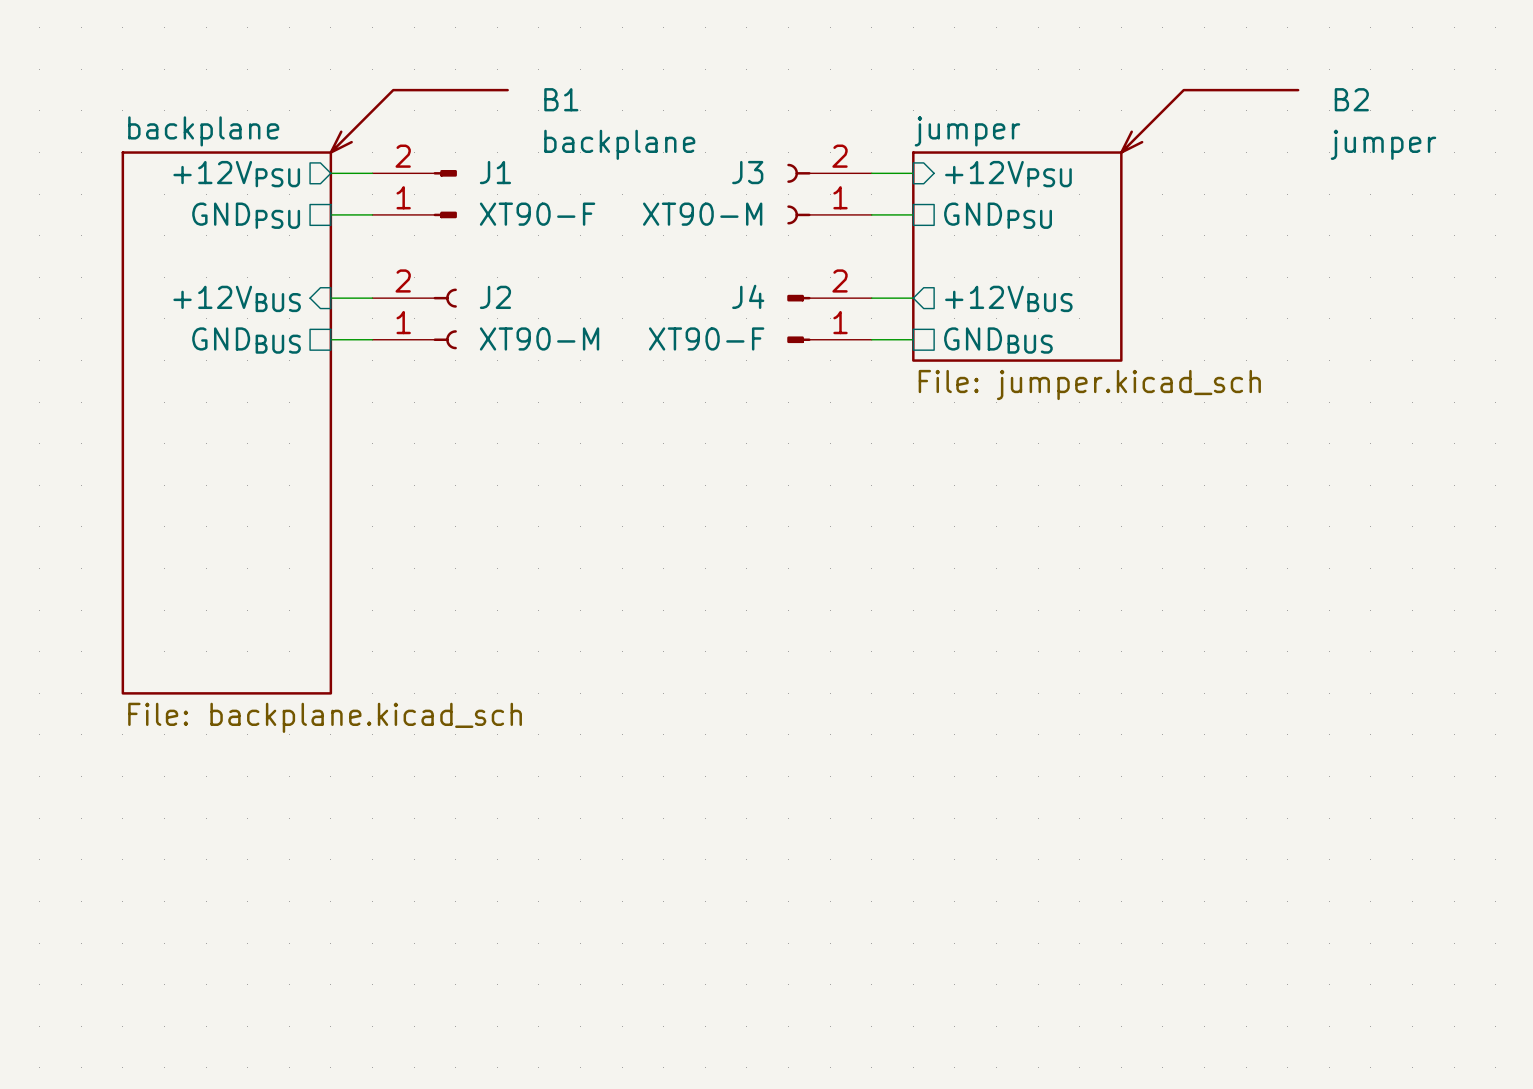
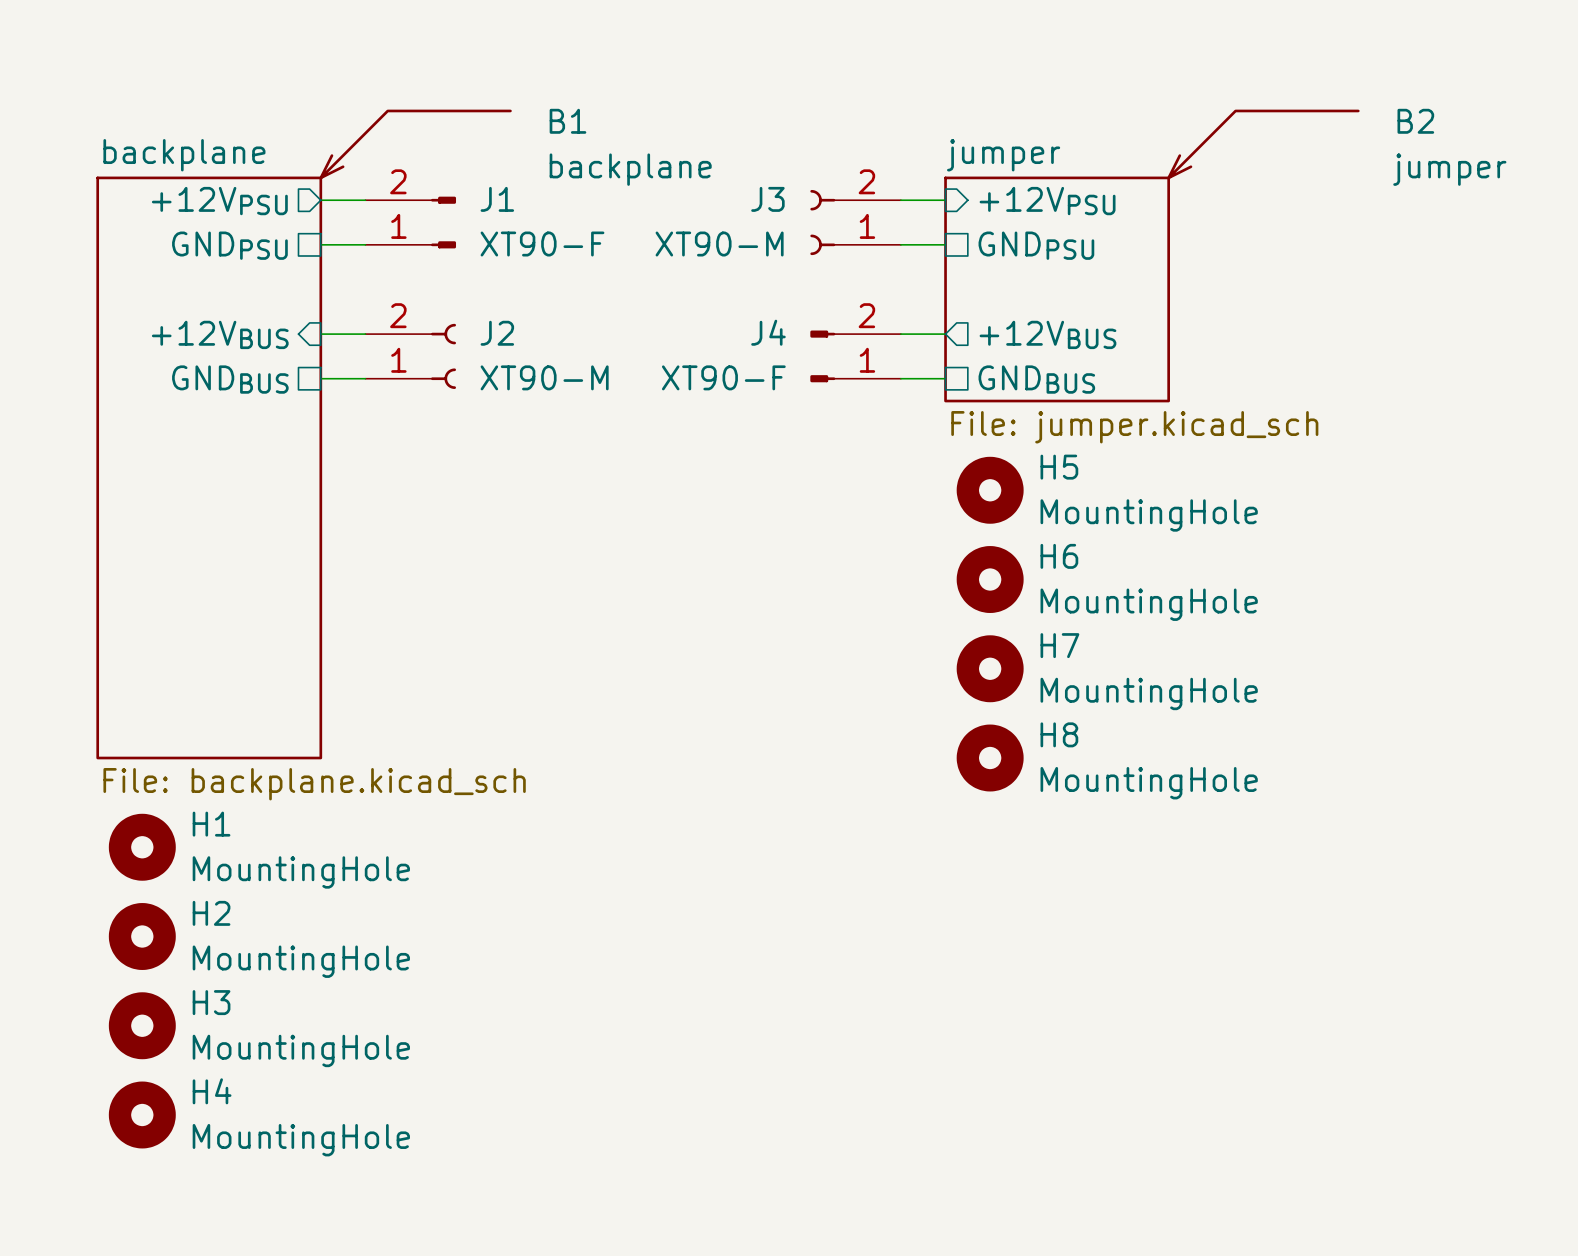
H5: none -> MountingHole (990, 490)
H6: none -> MountingHole (990, 579)
H7: none -> MountingHole (990, 668)
H8: none -> MountingHole (990, 758)
H1: none -> MountingHole (142, 847)
H2: none -> MountingHole (142, 936)
H3: none -> MountingHole (142, 1025)
H4: none -> MountingHole (142, 1114)

